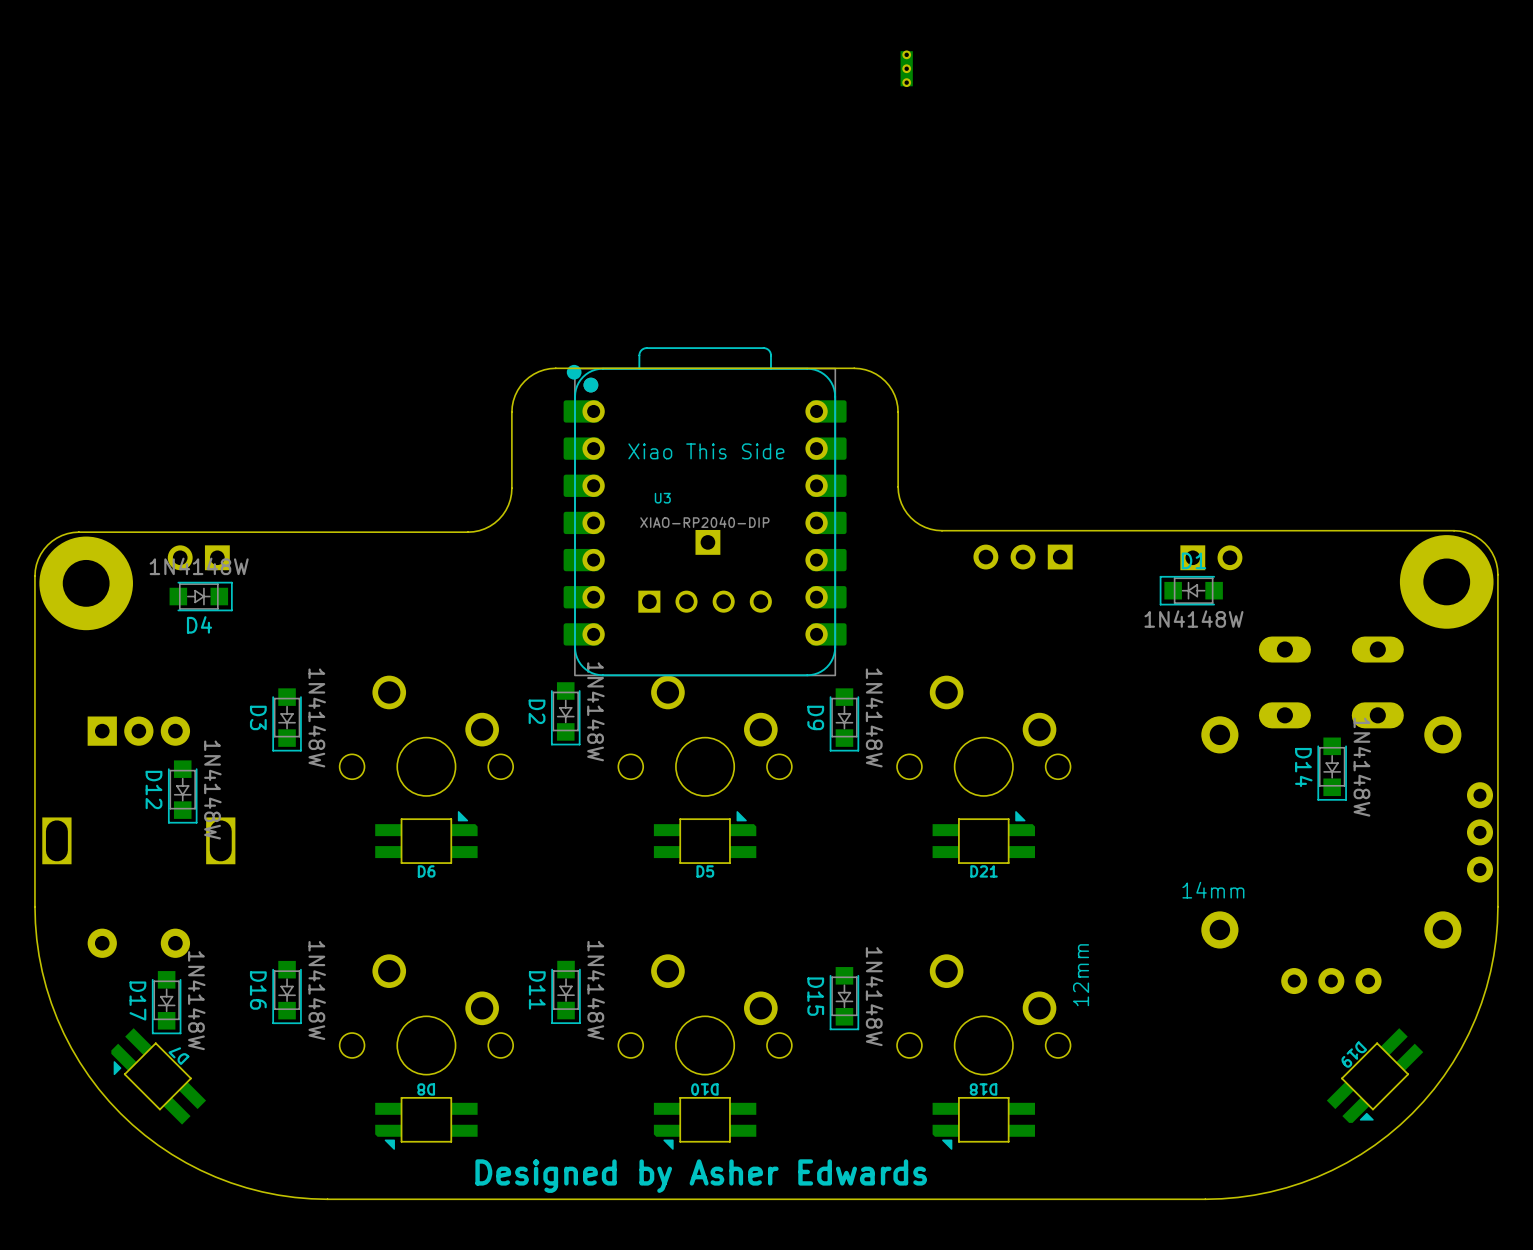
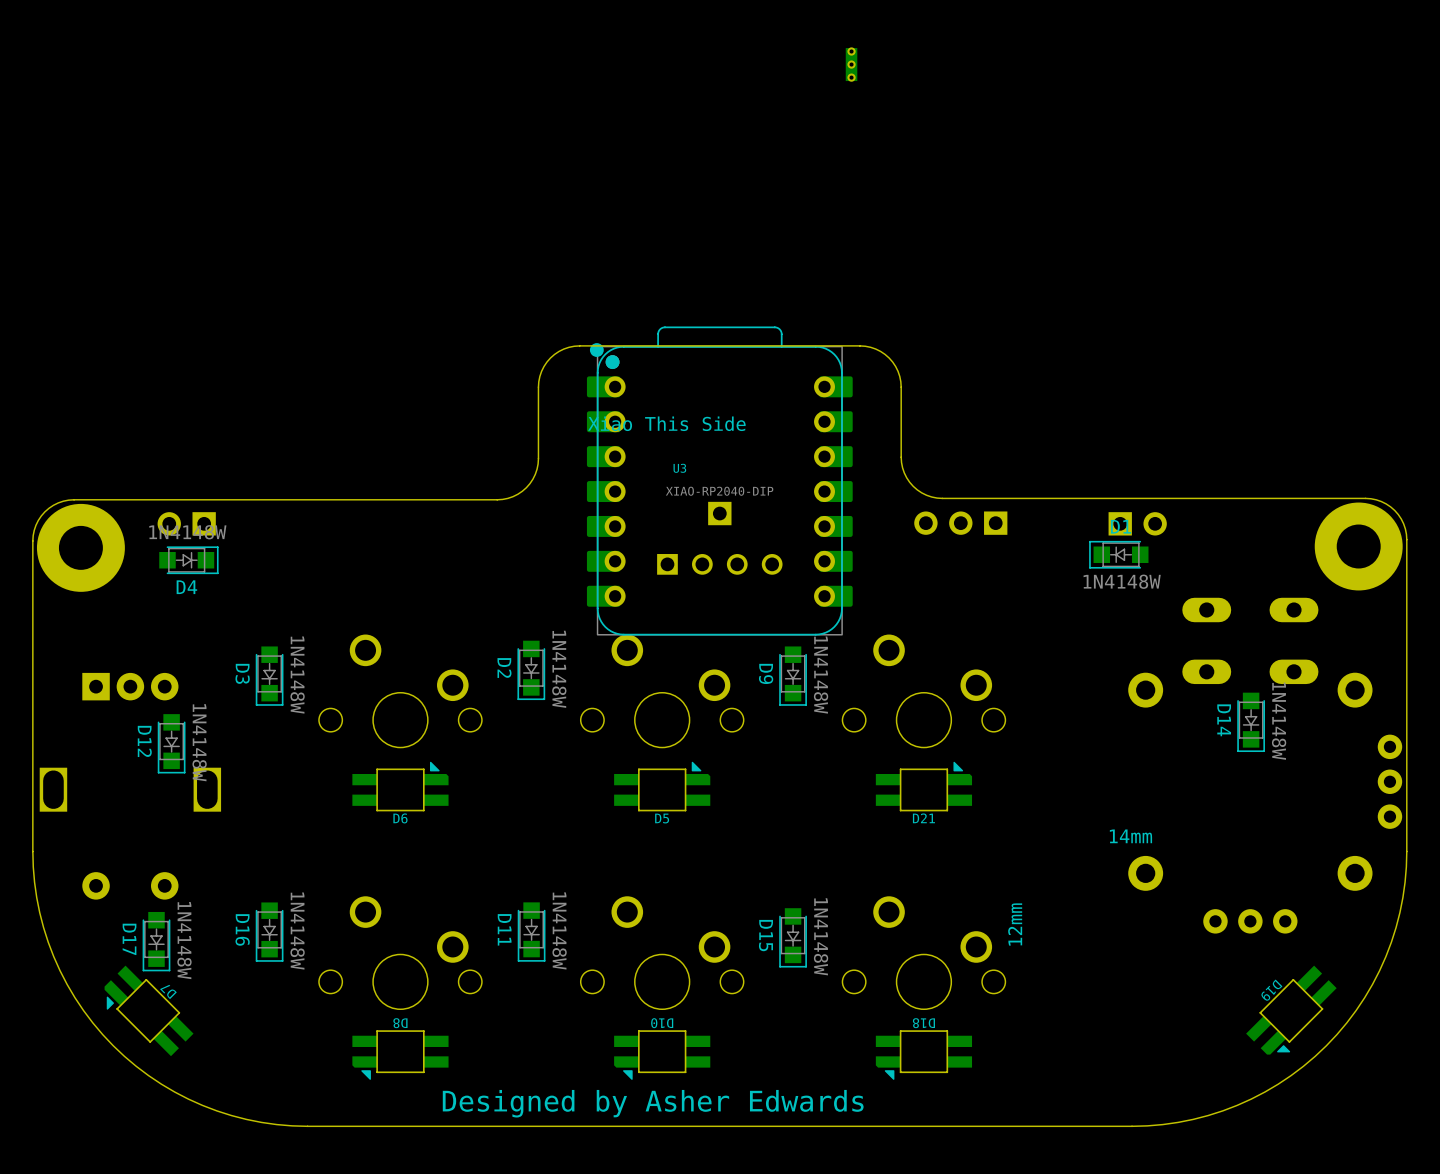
board edge: (617, 368) (550, 368) (538, 371) (524, 381) (517, 390) (512, 406) (511, 488) (508, 505) (499, 519) (489, 526) (468, 532) -> (579, 345) (569, 347) (554, 354) (541, 371) (538, 387) (538, 463) (532, 479) (526, 487) (513, 496) (502, 499) (439, 499)
board edge: (854, 368) (876, 374) (885, 381) (894, 395) (898, 412) (898, 492) (903, 508) (910, 517) (925, 527) (936, 530) (1003, 530) -> (802, 345) (865, 346) (880, 351) (889, 357) (898, 371) (900, 381) (901, 457) (904, 472) (909, 482) (921, 492) (942, 498)
U3 position: (705, 511) -> (719, 480)
part position: (707, 542) -> (719, 513)
part position: (705, 601) -> (719, 564)

